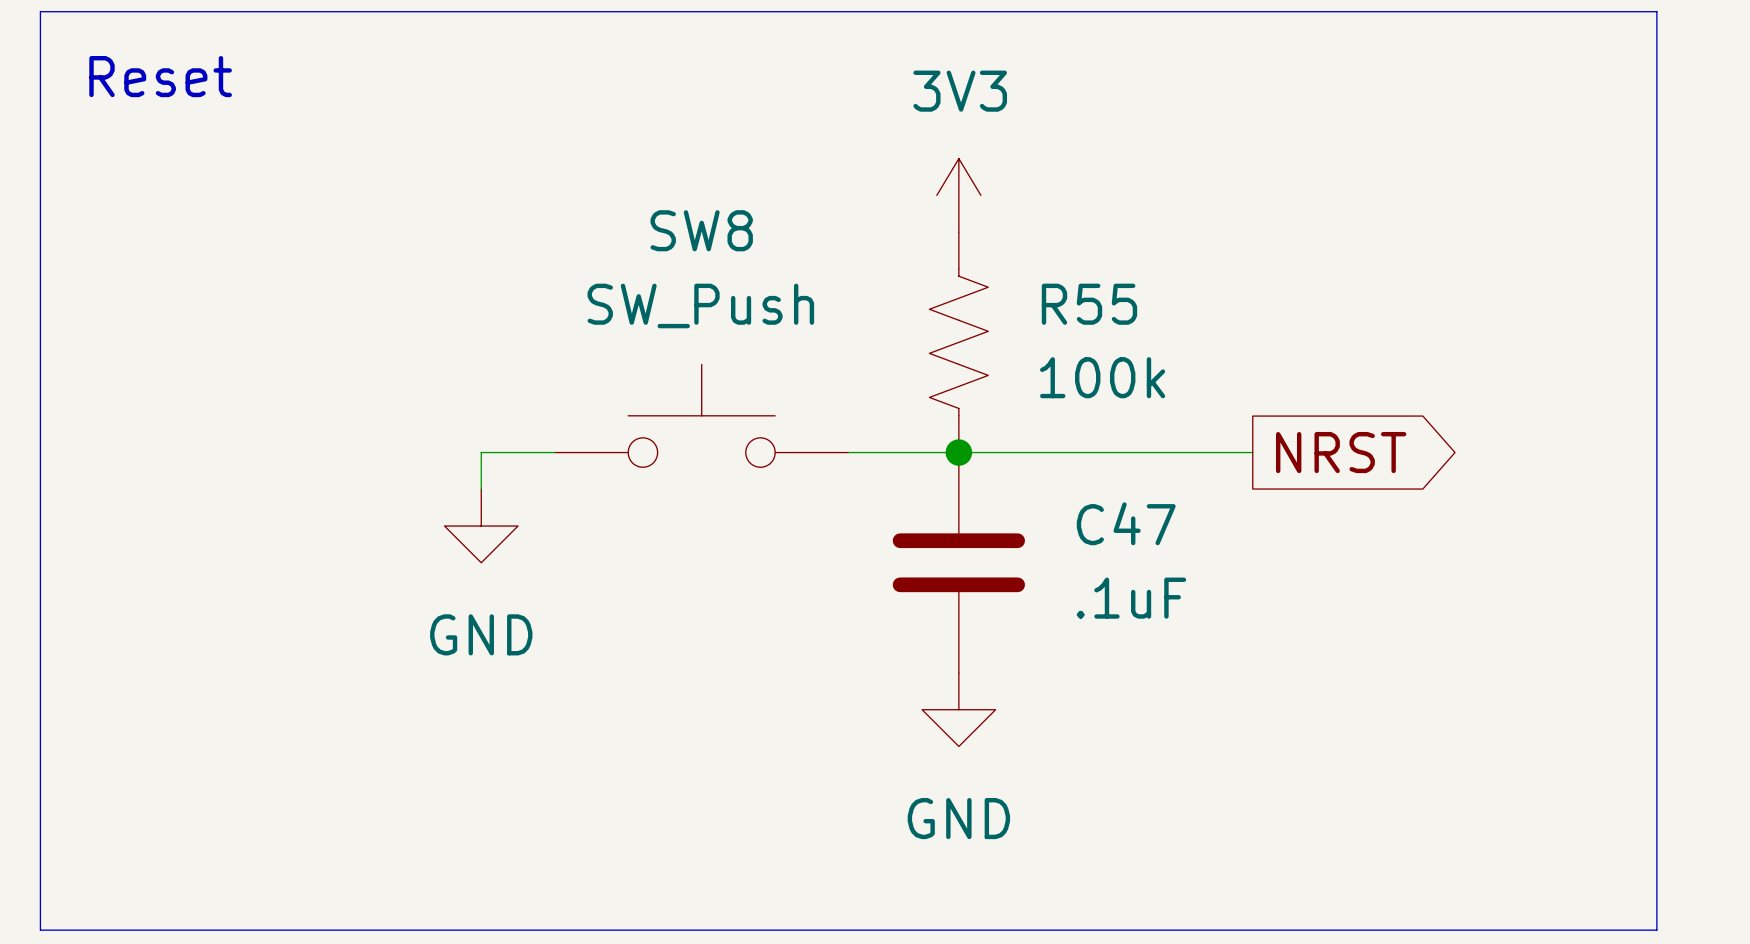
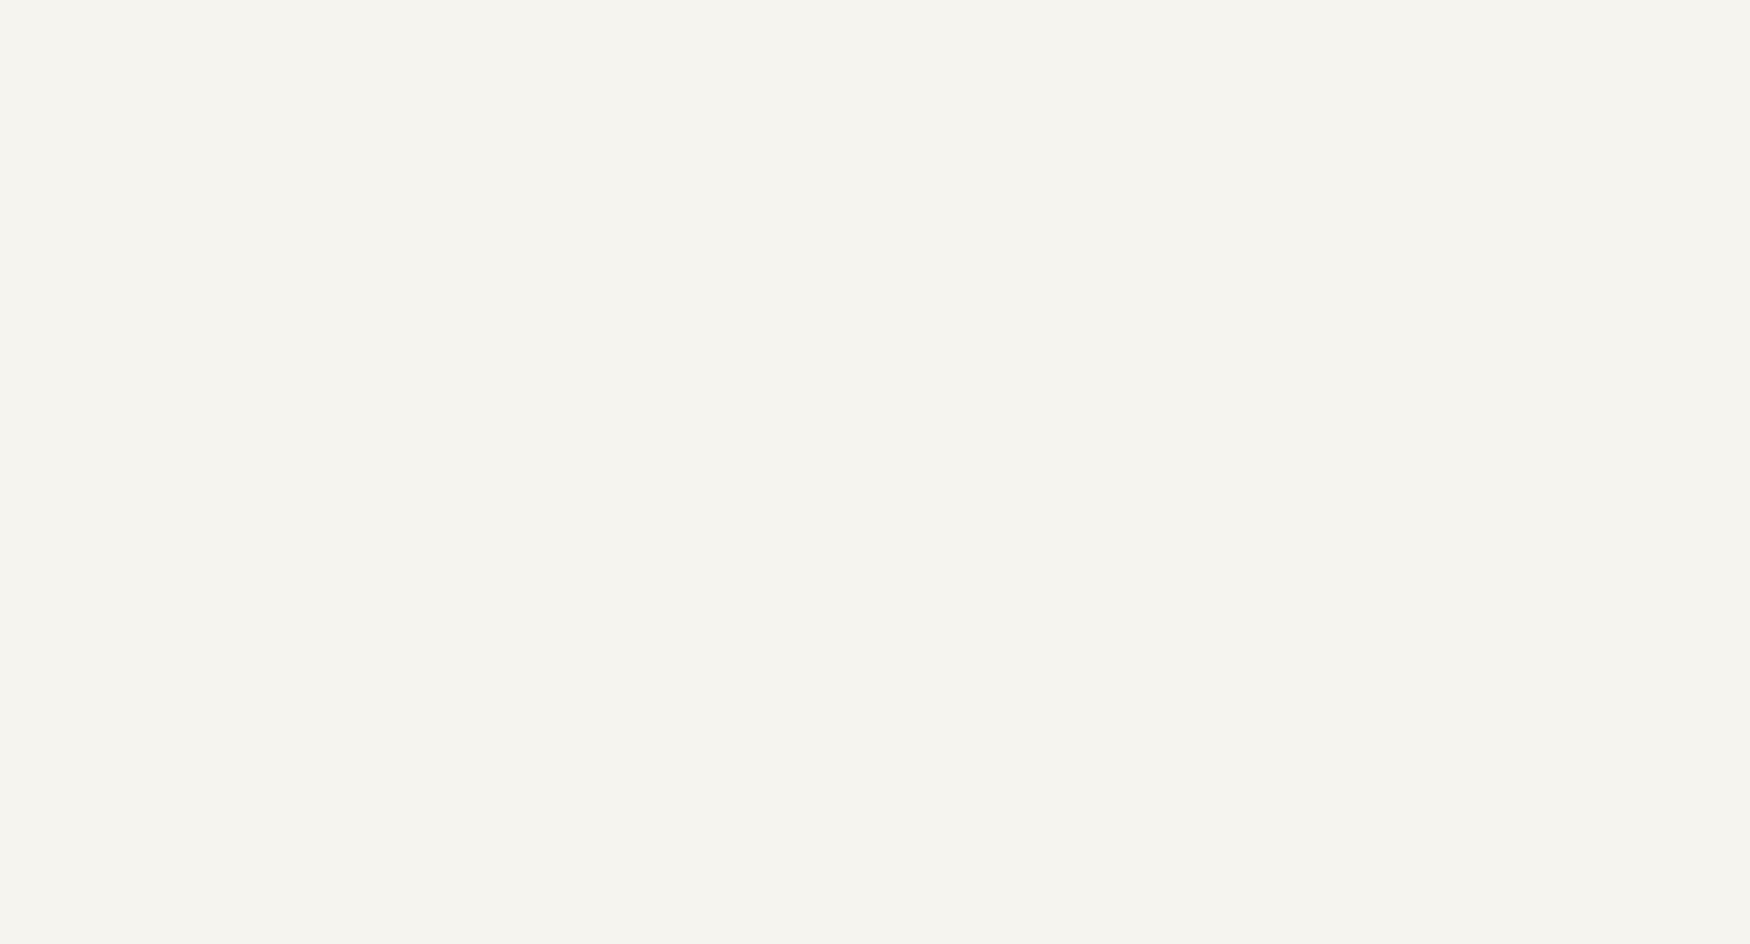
line: (40, 11) (1656, 11) (1656, 930) (40, 930) (40, 11) -> none
text: Reset (160, 76) -> none
power symbol: 3V3 (958, 195) -> none
R55: 100k (958, 342) -> none
SW8: SW_Push (701, 415) -> none
wire: (554, 452) (481, 452) (481, 489) -> none
wire: (848, 452) (1252, 452) -> none
junction: (958, 452) -> none
global label: NRST (1341, 452) -> none
power symbol: GND (481, 526) -> none
C47: .1uF (958, 562) -> none
power symbol: GND (958, 709) -> none

